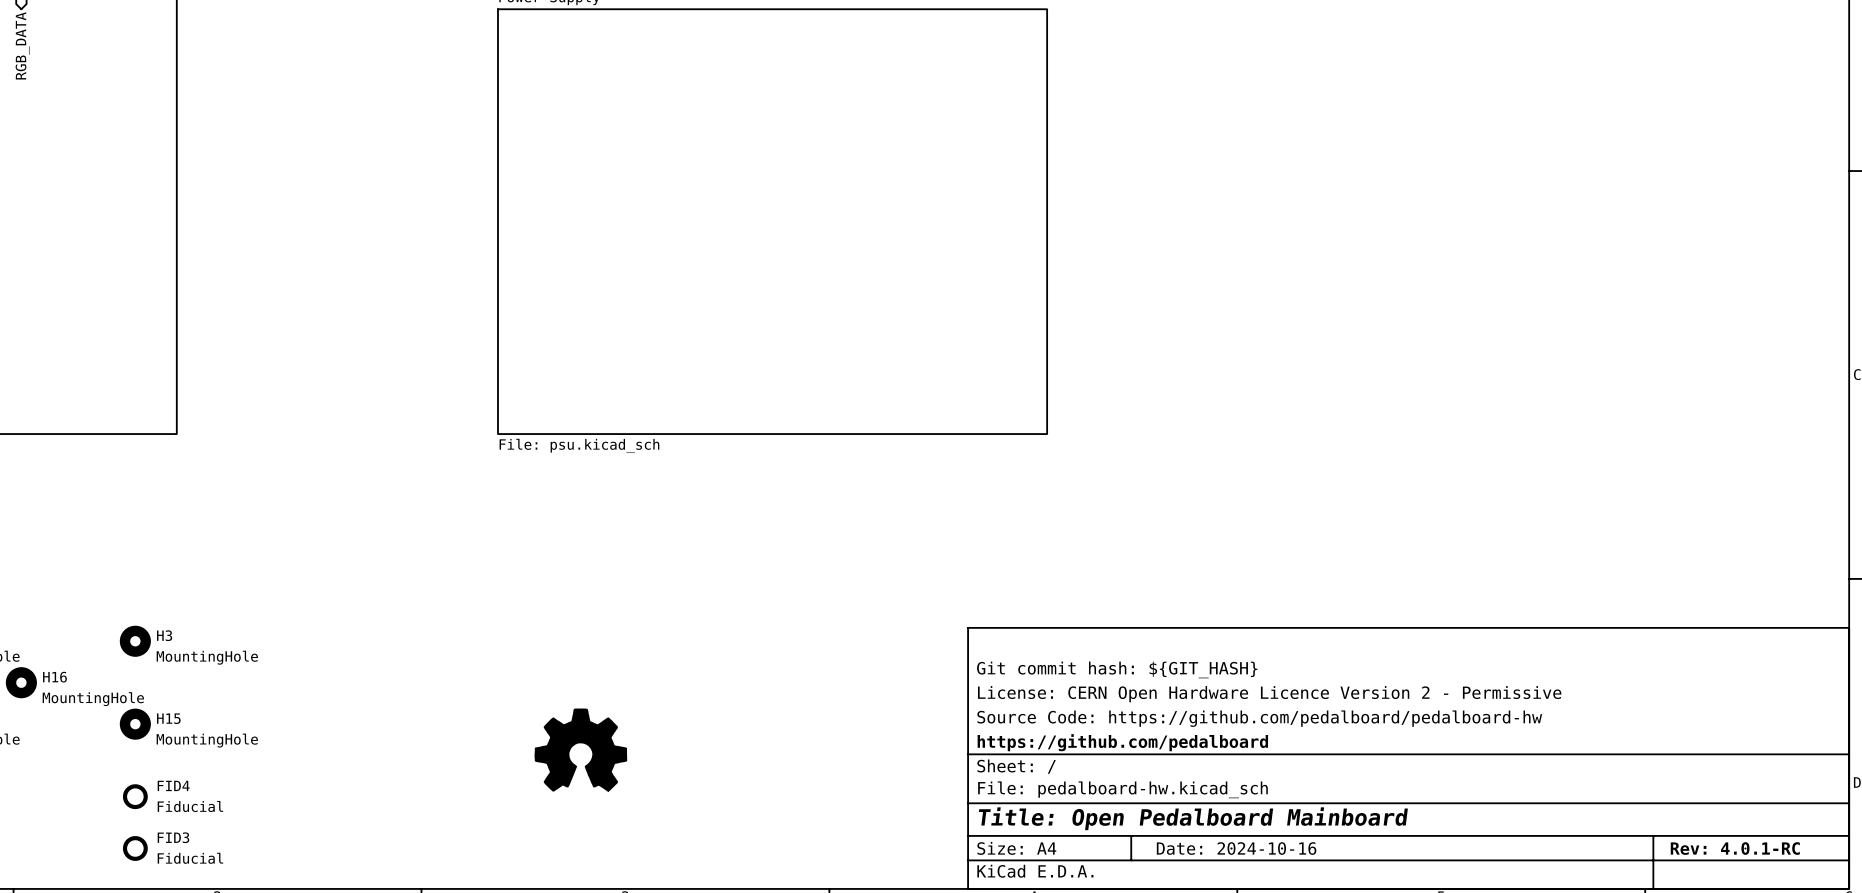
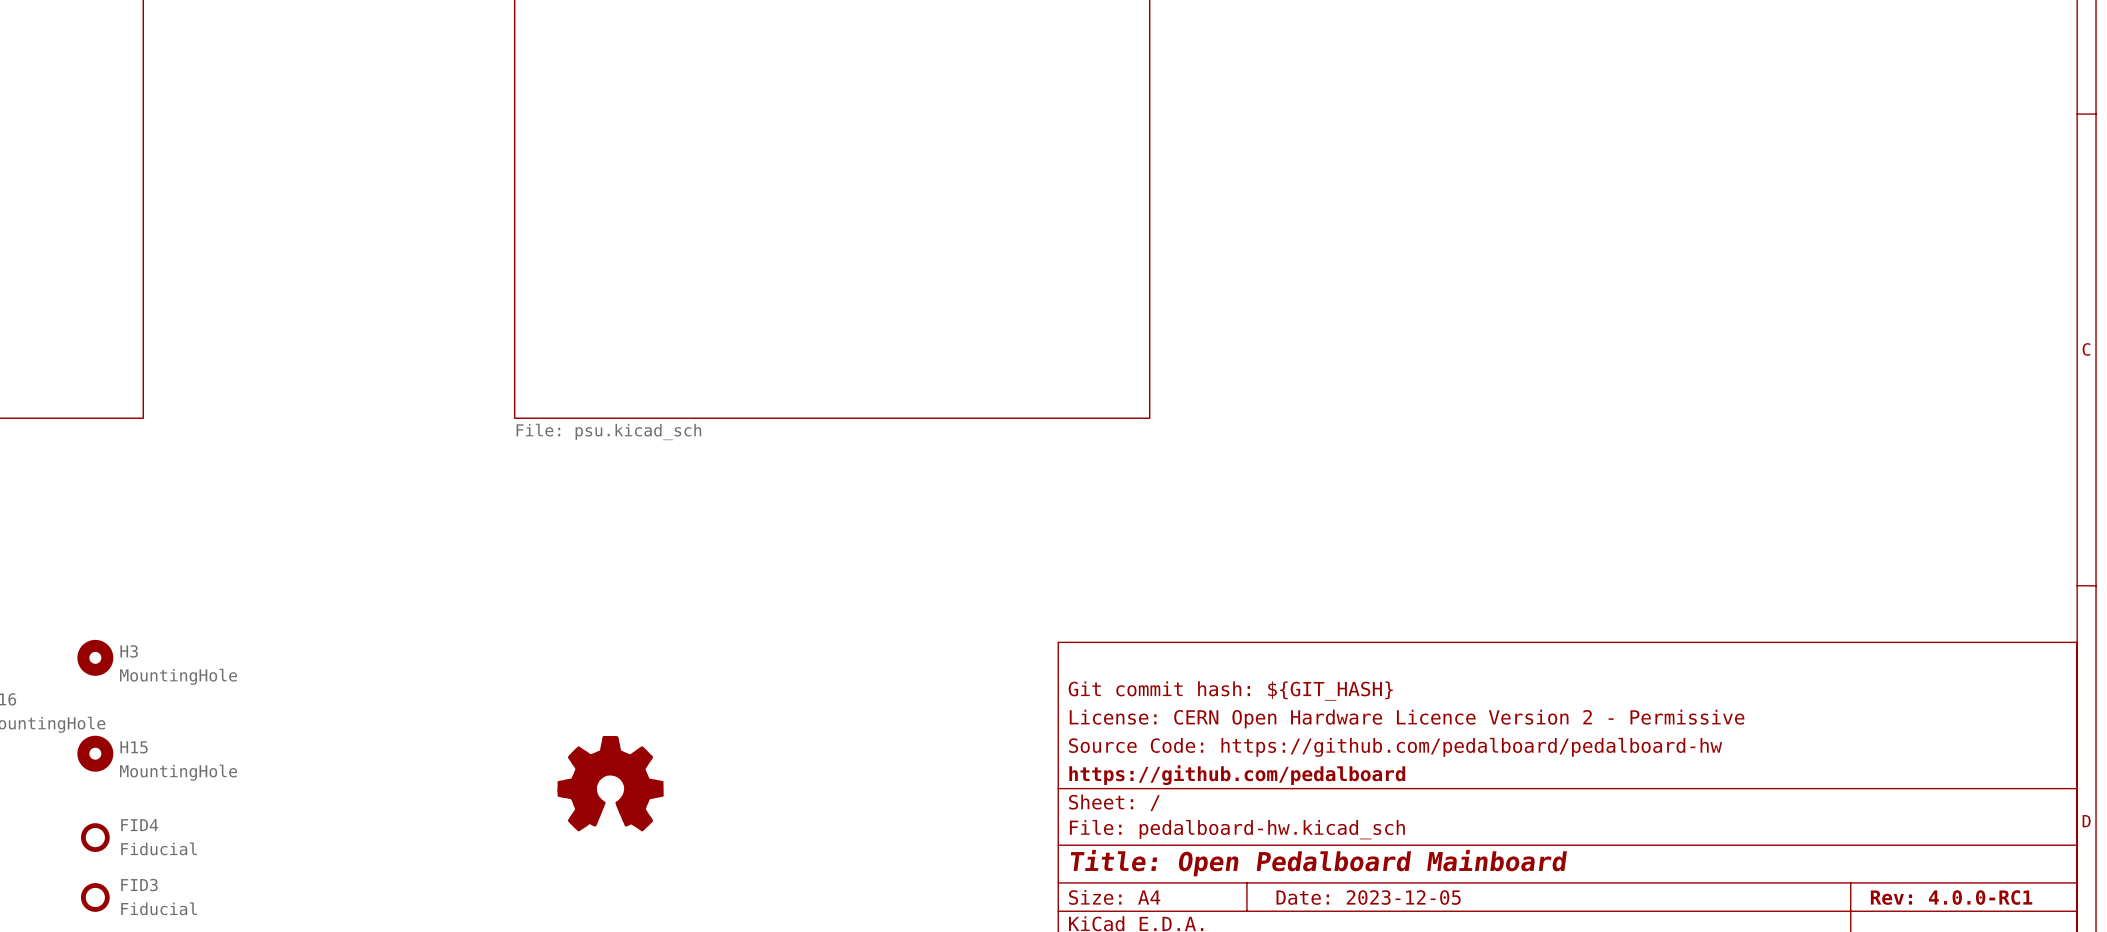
title block: Date: 2024-10-16 (1236, 848) -> Date: 2023-12-05 (1368, 897)
title block: Rev: 4.0.1-RC (1735, 848) -> Rev: 4.0.0-RC1 (1951, 897)

